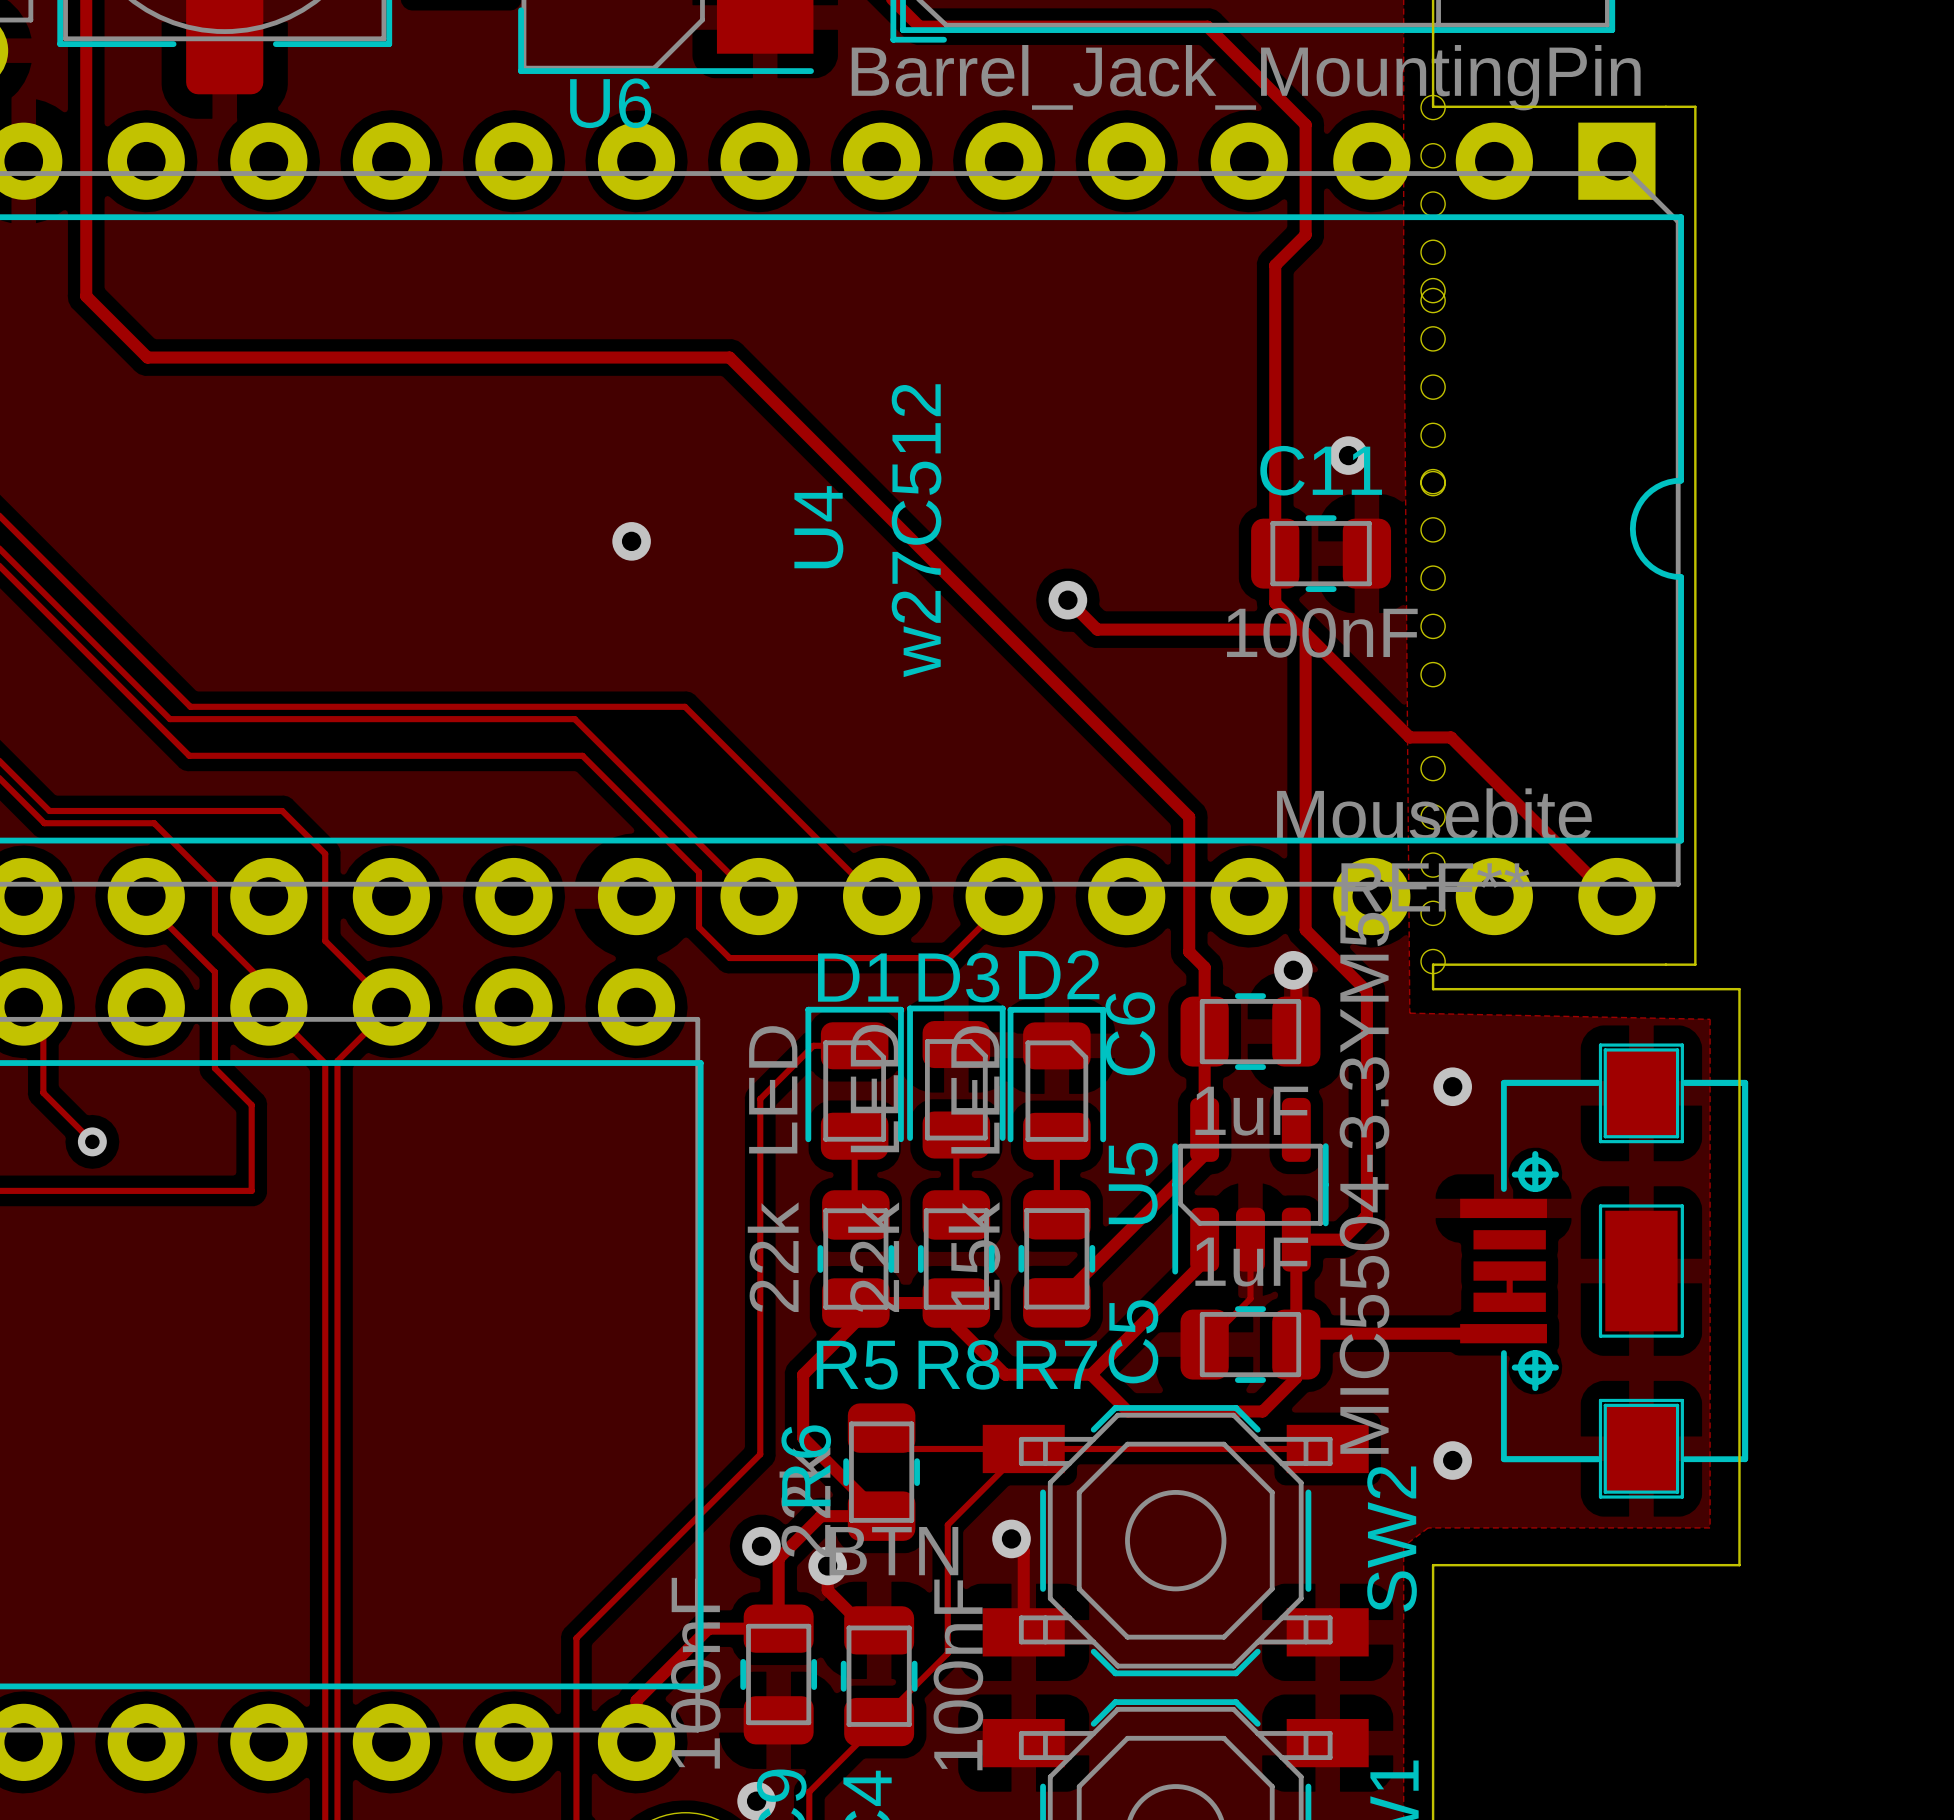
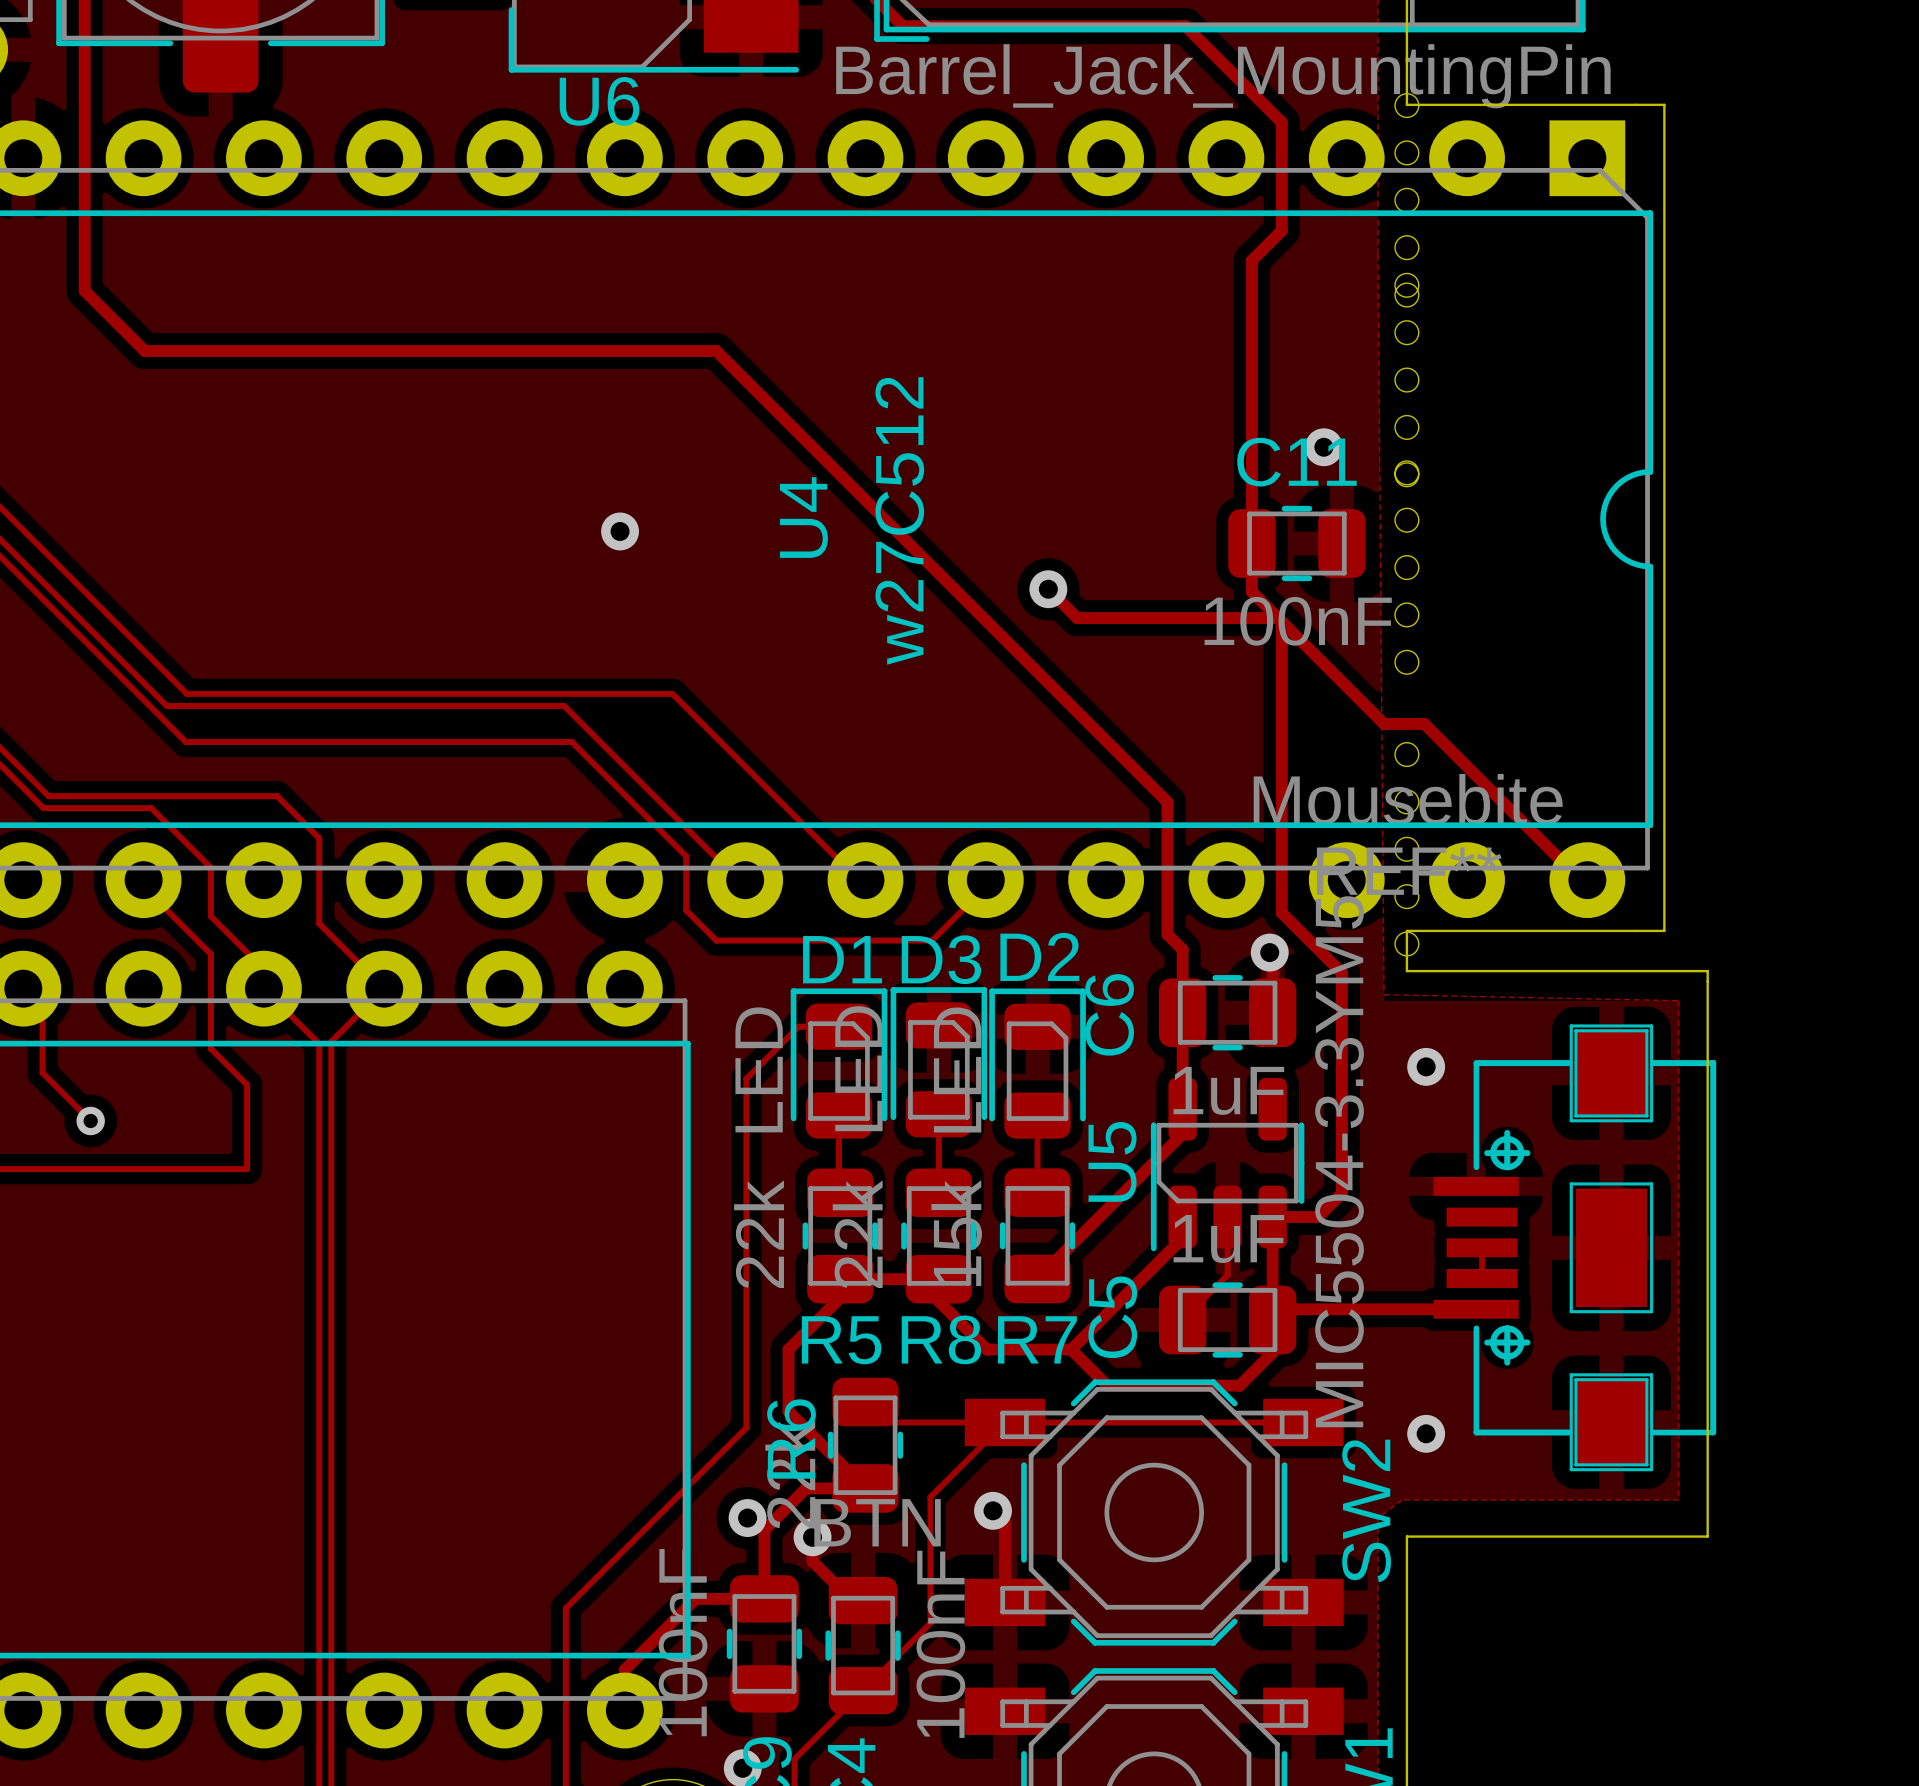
board edge: (1695, 948) (1695, 964) (1433, 964) -> (1664, 930) (1406, 930) (1406, 947)

